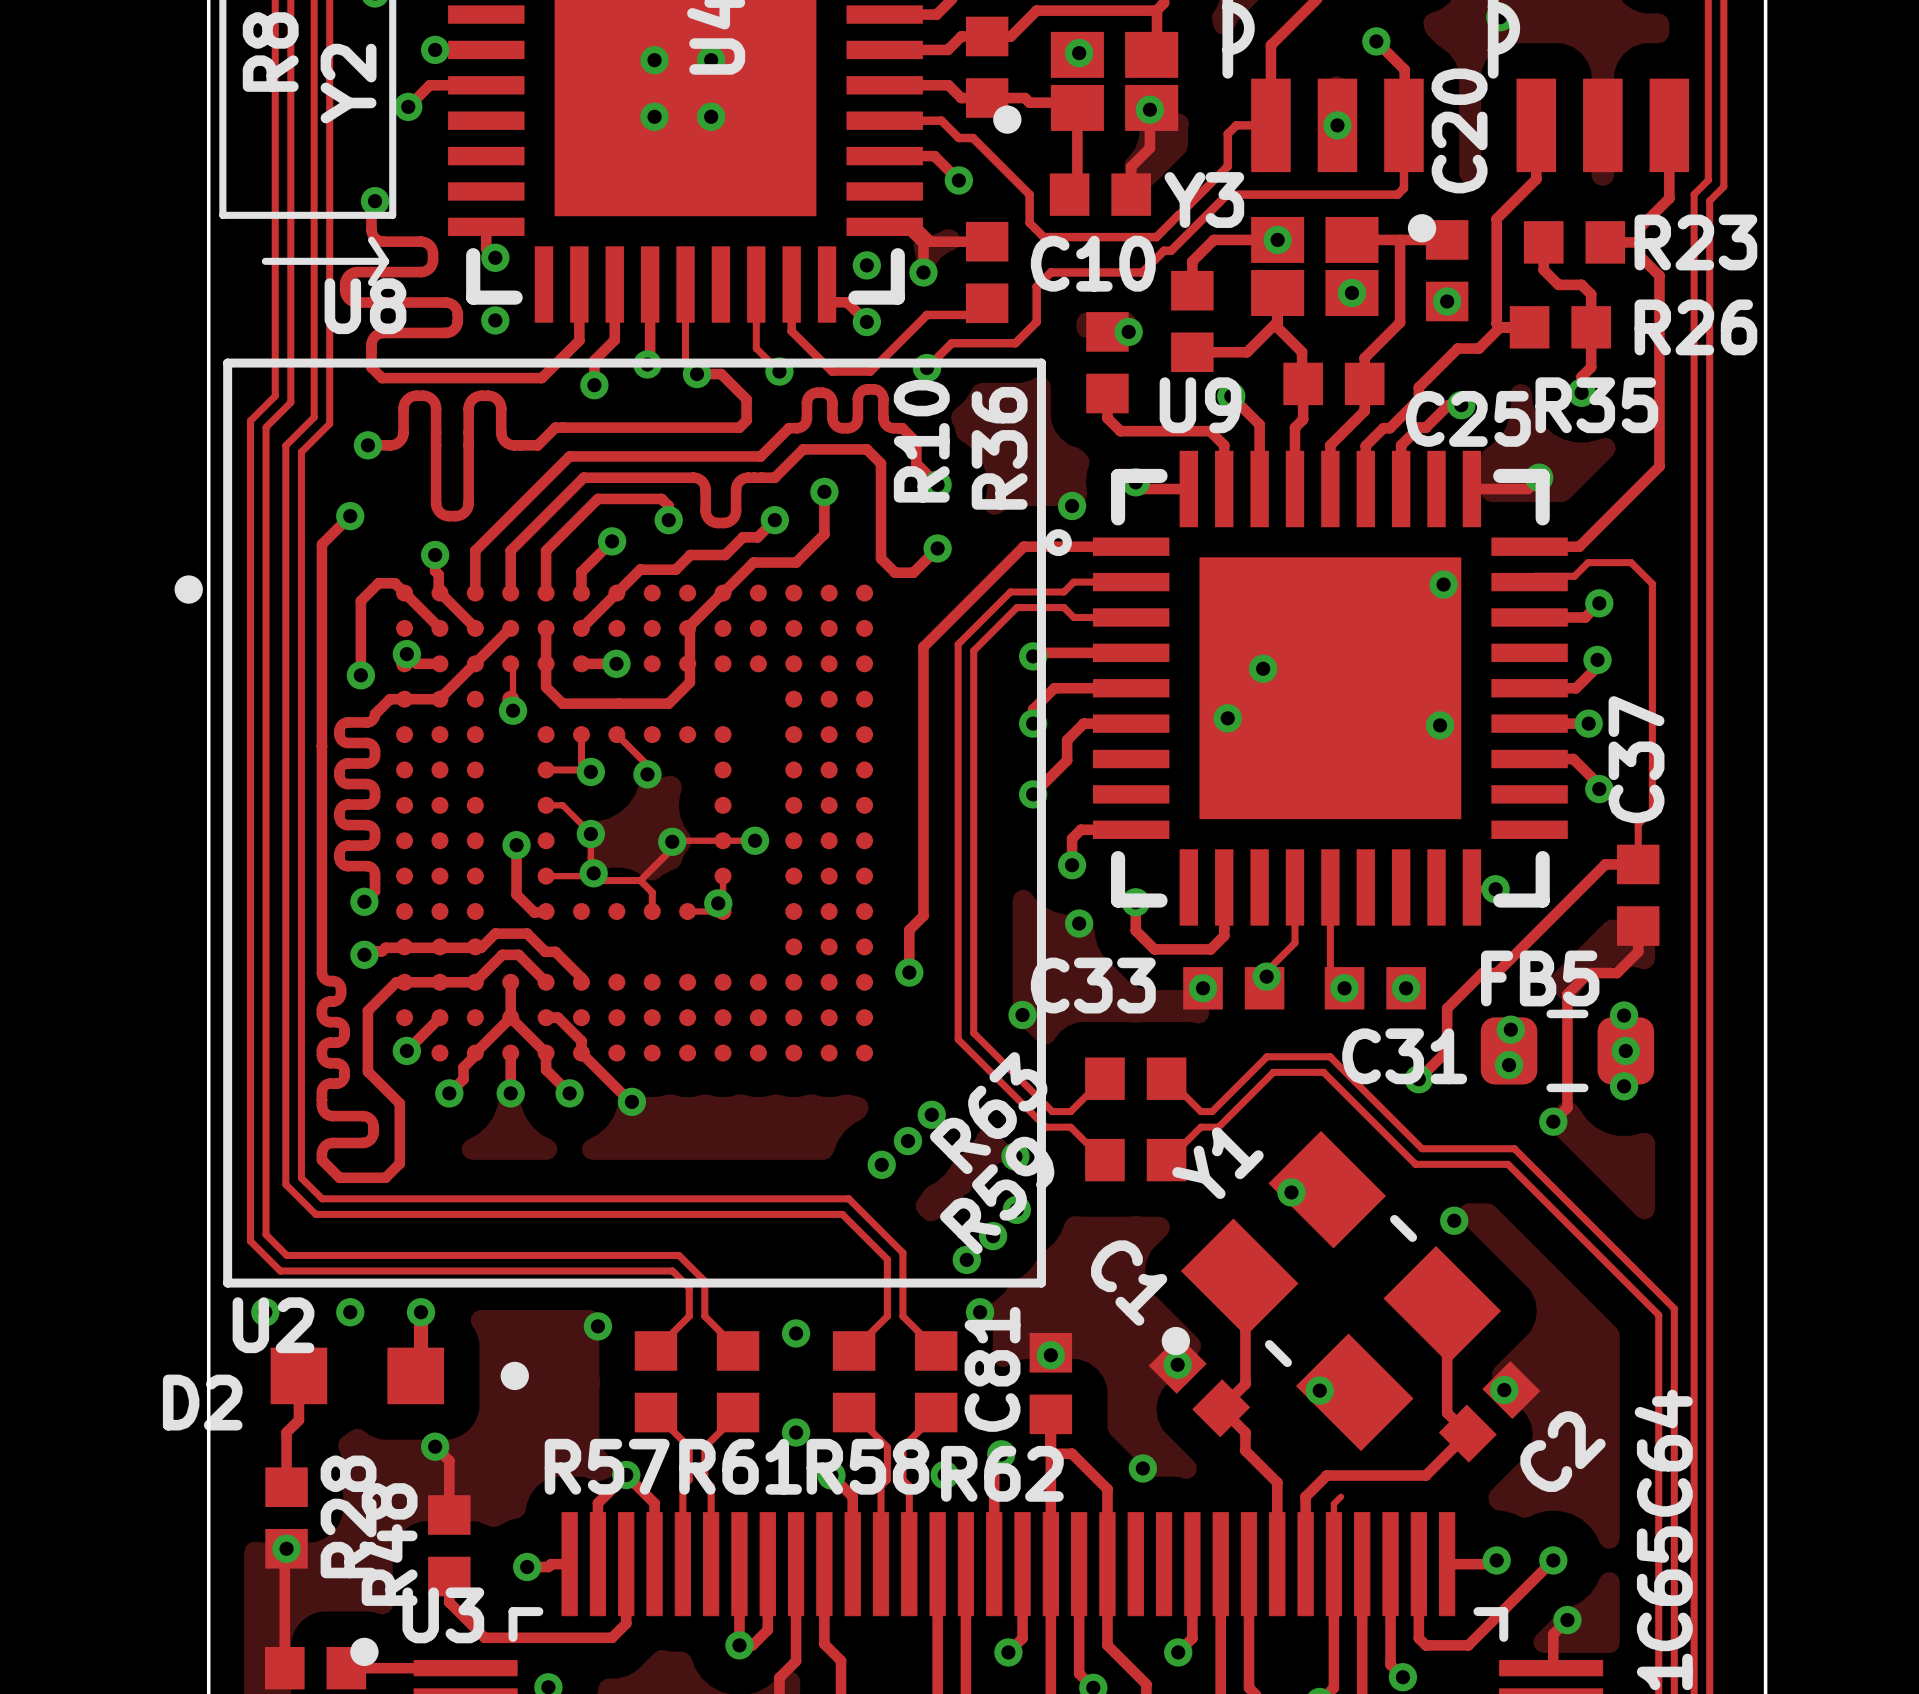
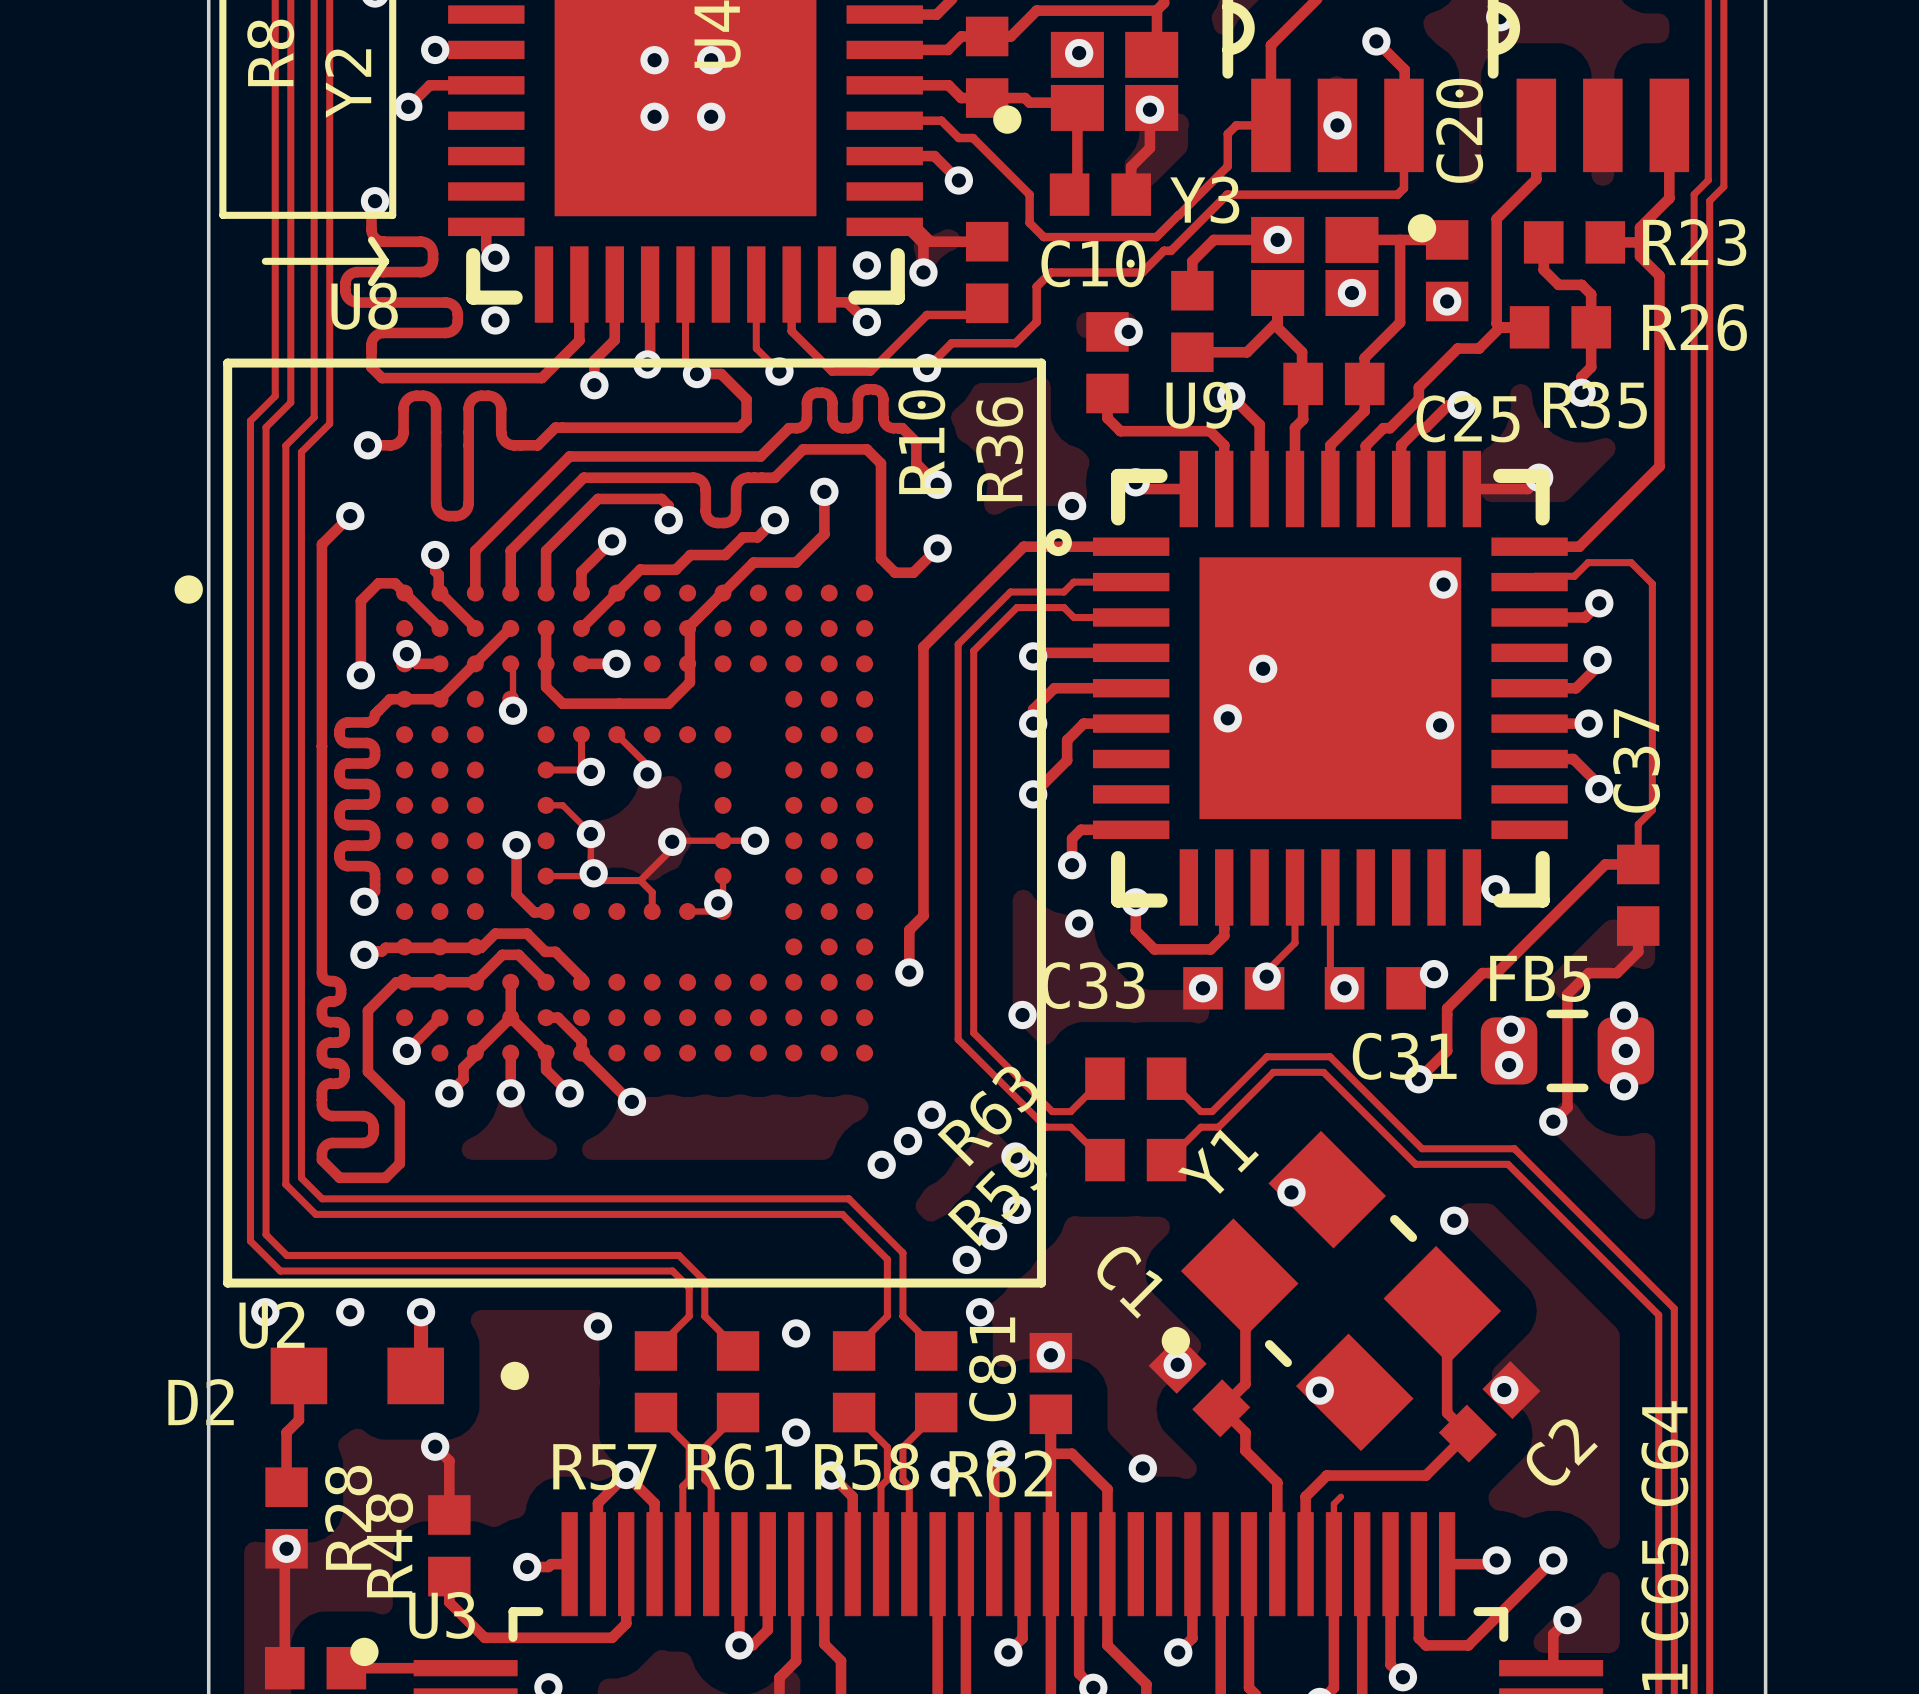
via position: (1406, 988) -> (1434, 974)

